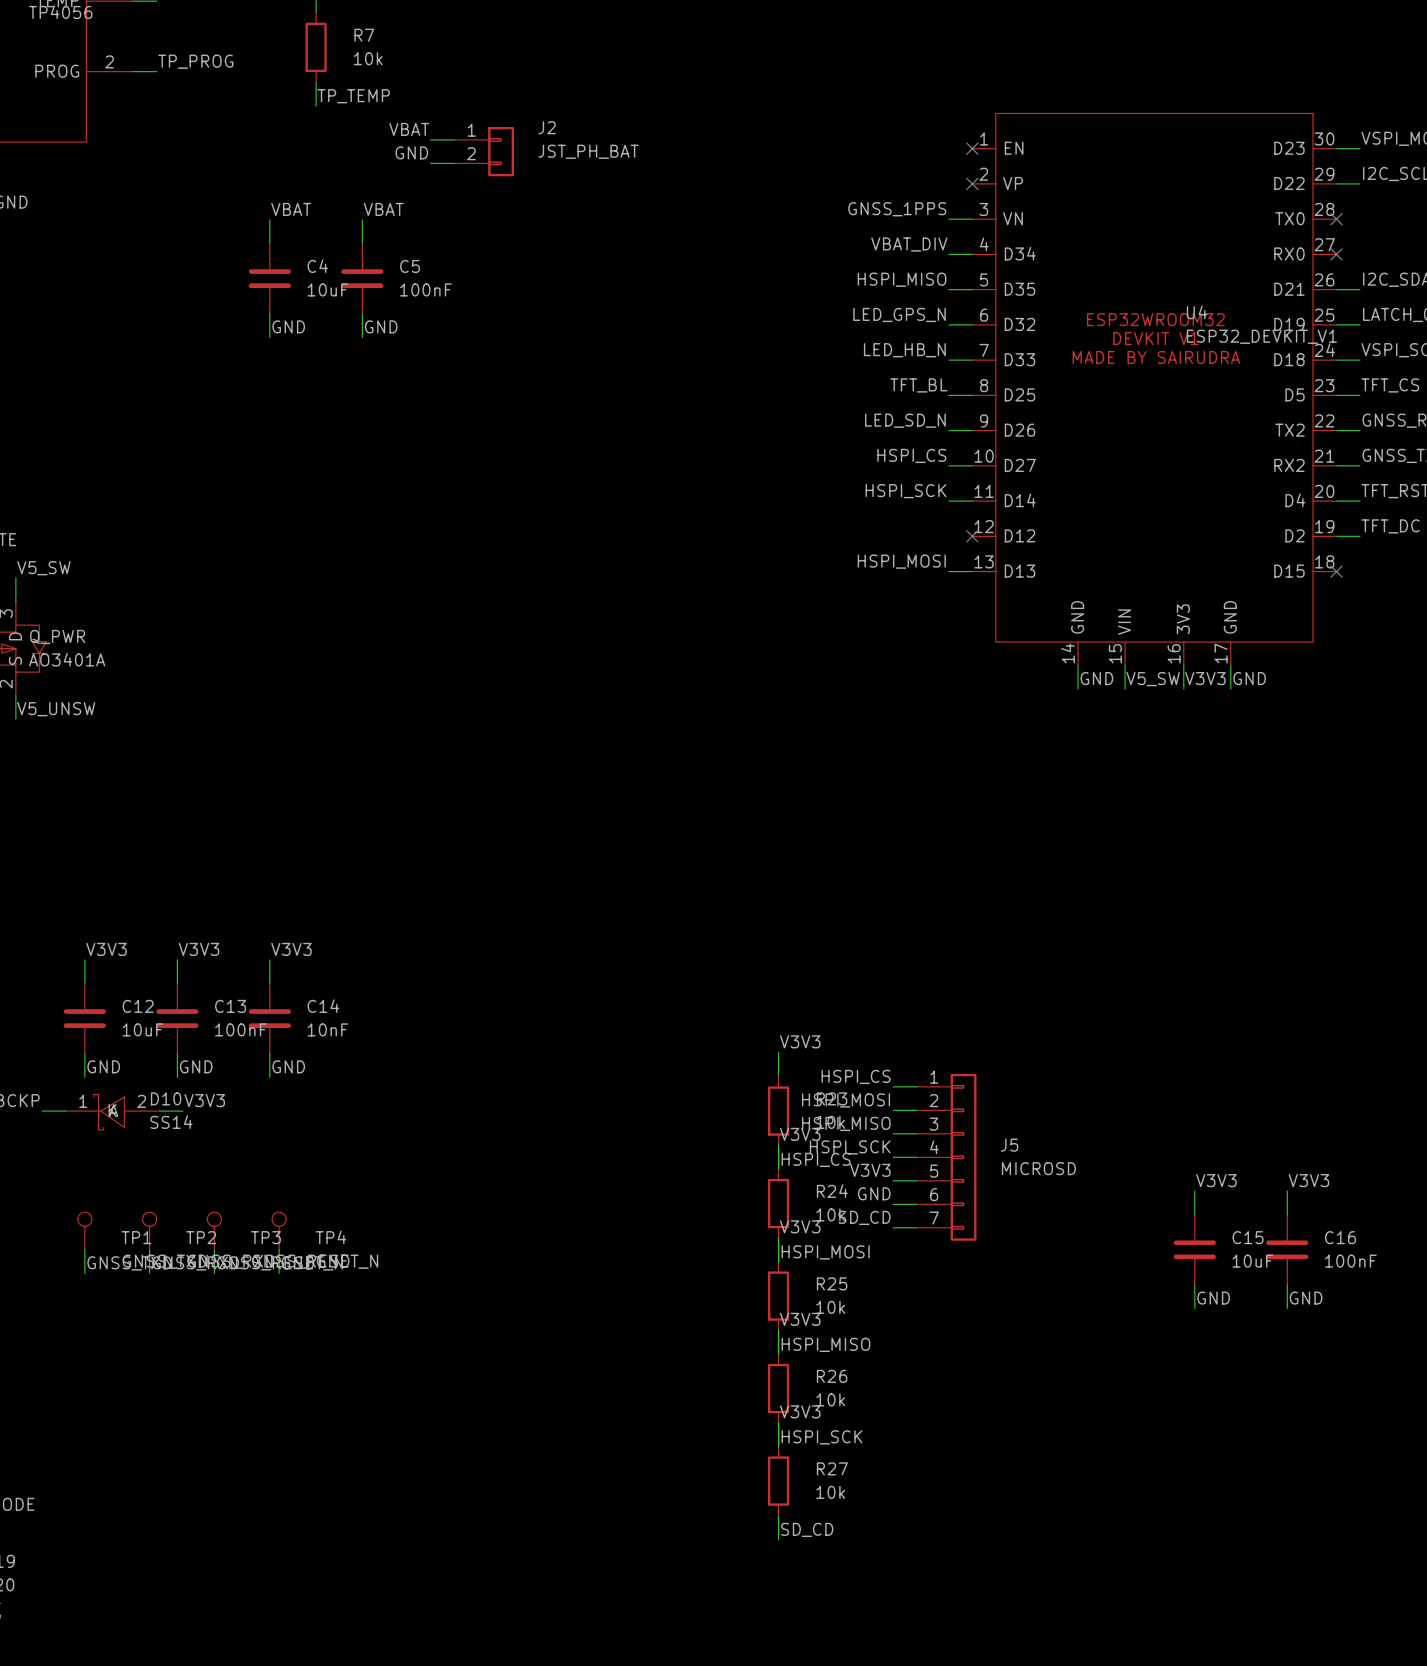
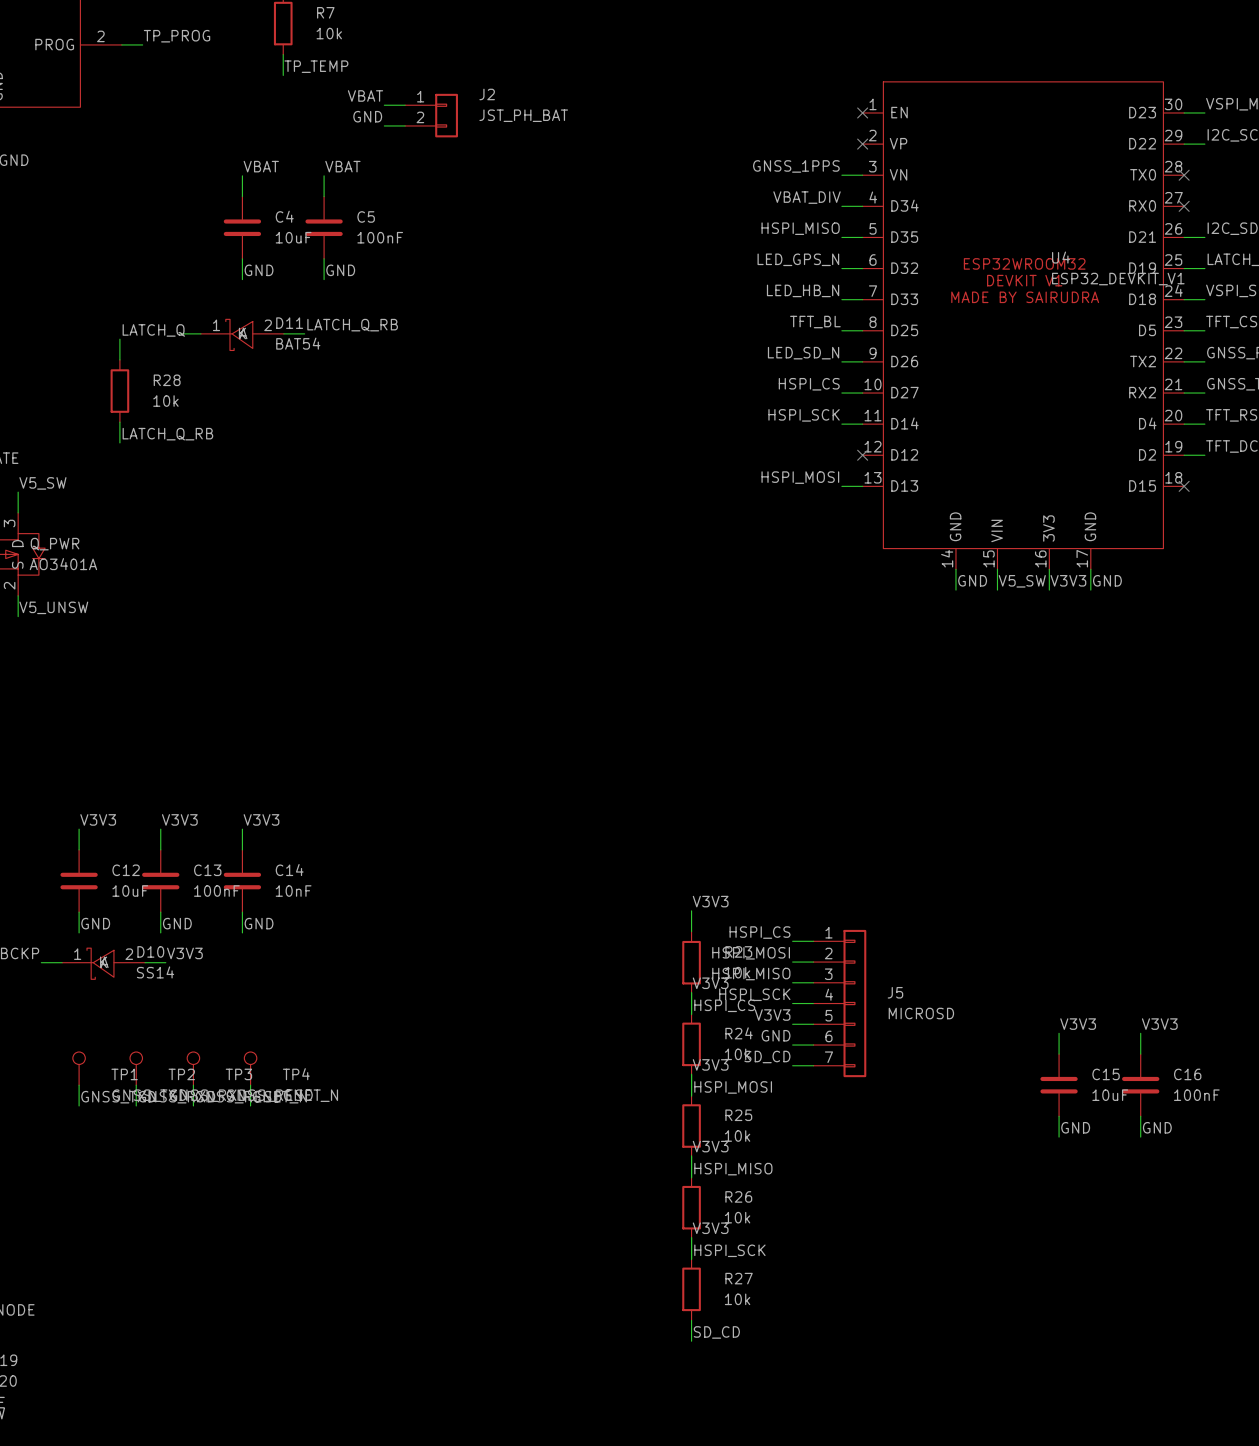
label: none -> LATCH_Q_RB (352, 325)
label: none -> LATCH_Q (153, 330)
wire: none -> (180, 333) (200, 333)
wire: none -> (283, 333) (304, 333)
D11: none -> BAT54 (242, 334)
wire: none -> (119, 339) (119, 359)
R28: none -> 10k (119, 391)
wire: none -> (119, 422) (119, 442)
label: none -> LATCH_Q_RB (167, 434)

